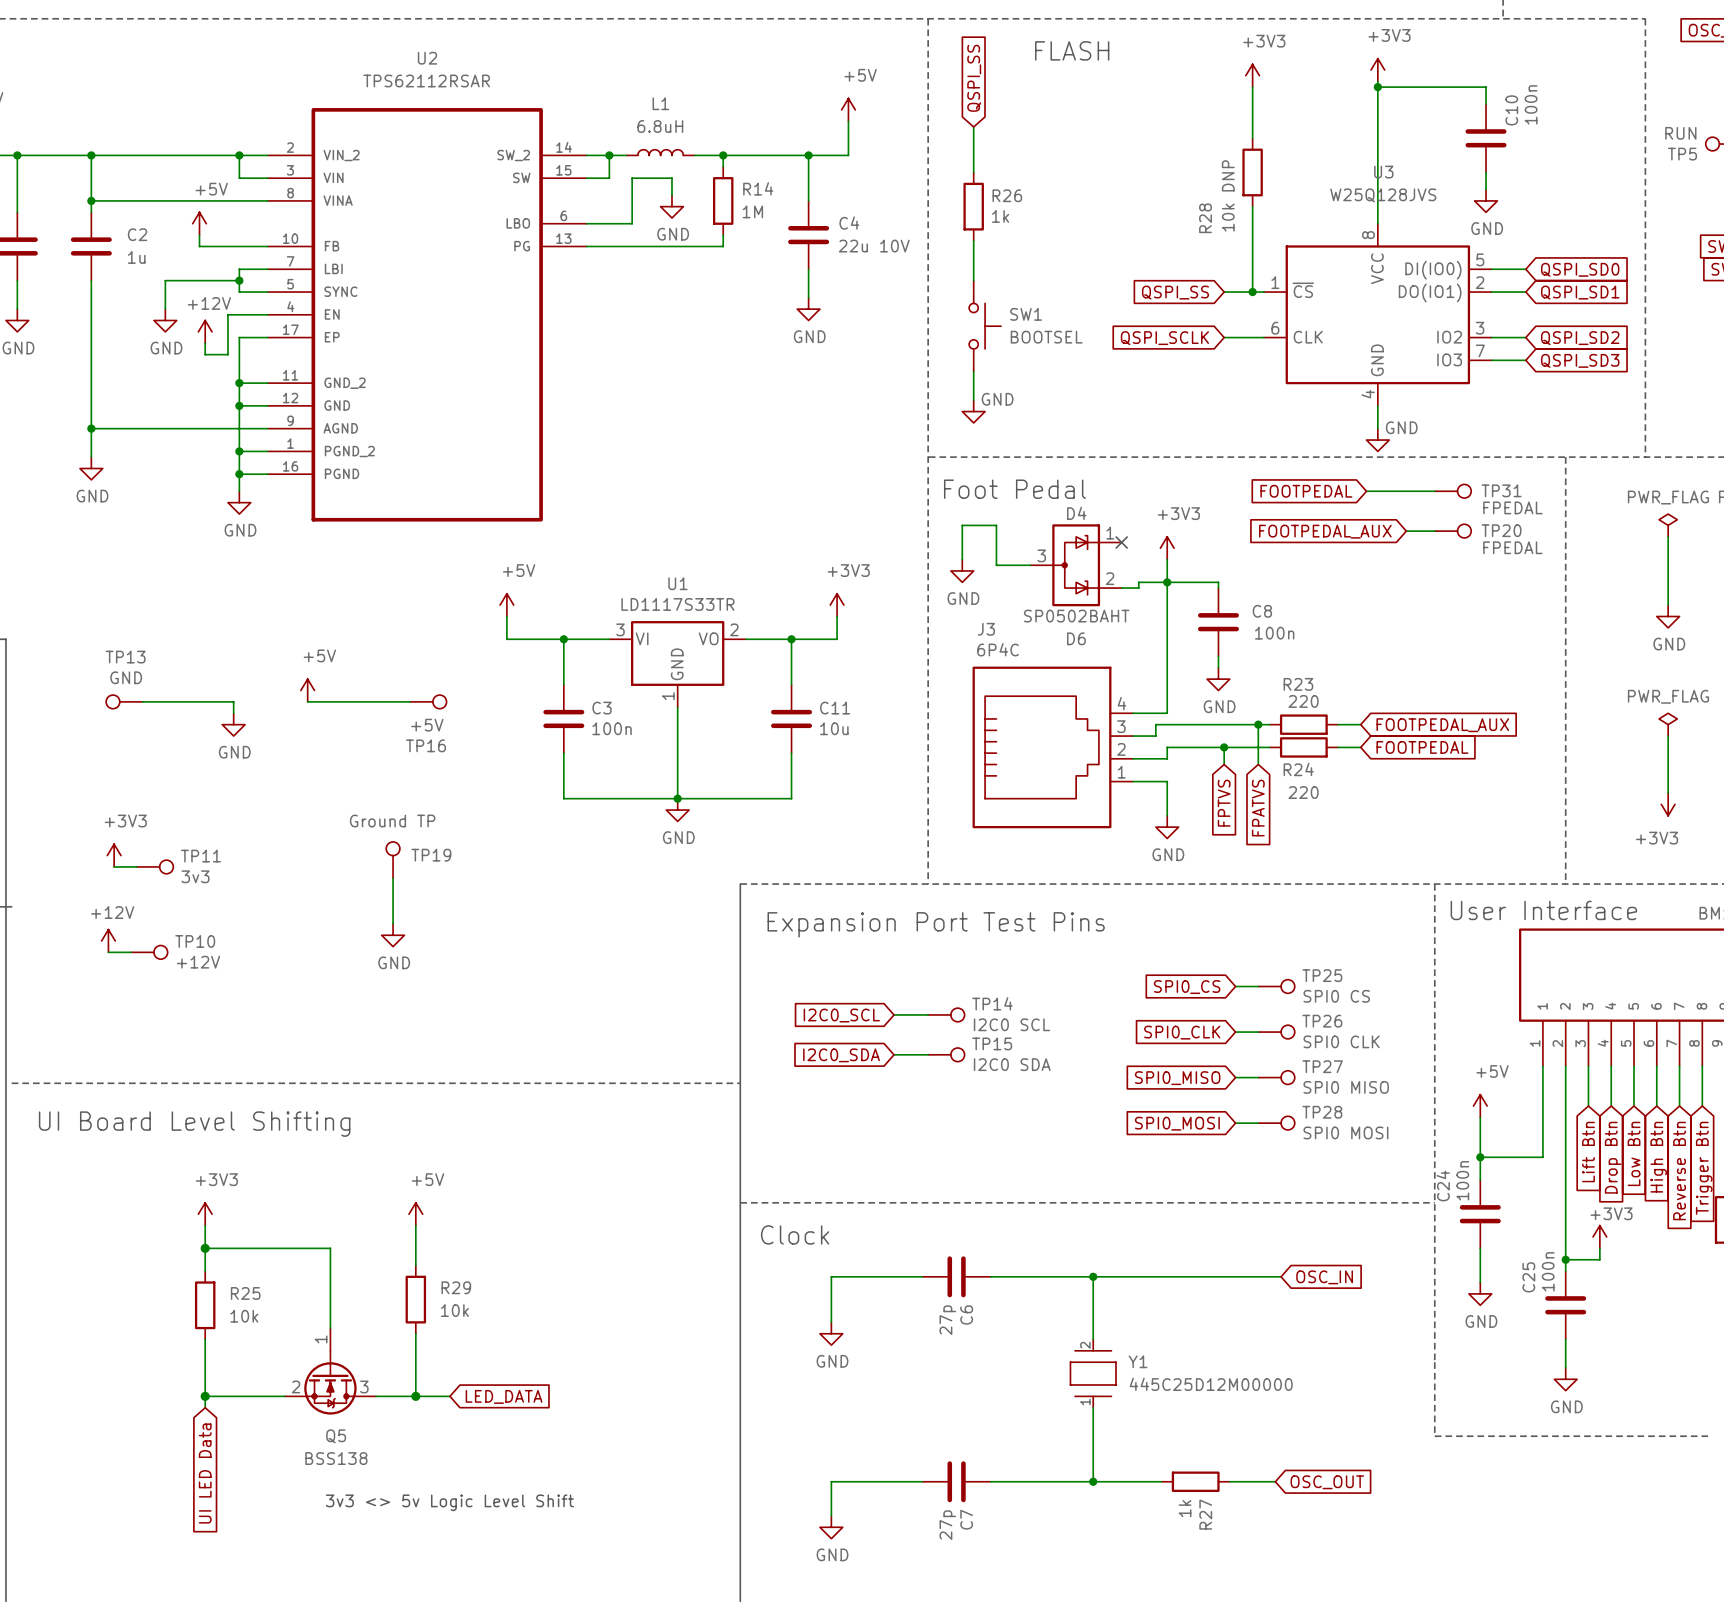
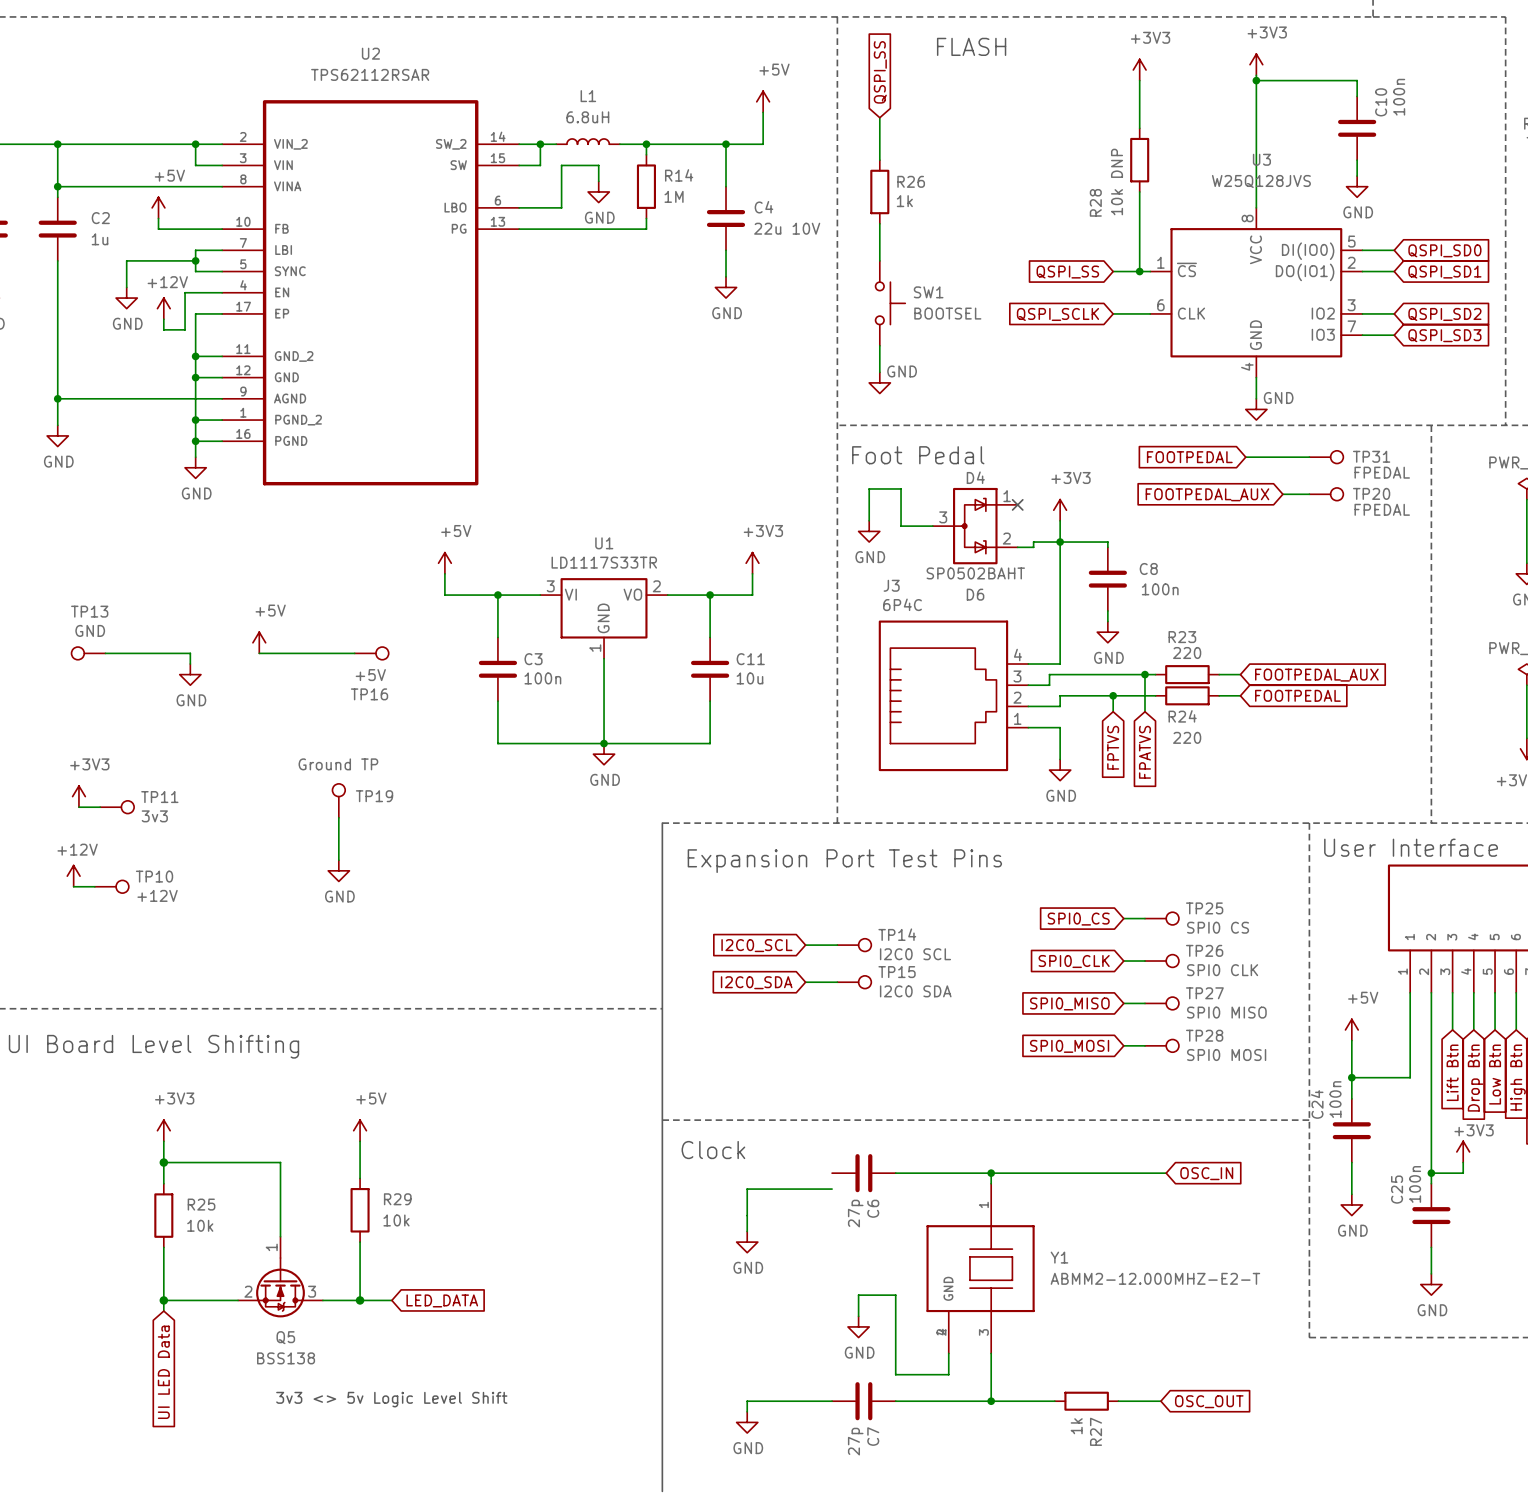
wire: none -> (991, 1173) (991, 1183)
C6 position: (956, 1276) -> (863, 1173)
wire: (990, 1276) (1281, 1276) -> (895, 1173) (1166, 1173)
junction position: (1093, 1276) -> (991, 1173)
global label position: OSC_IN (1324, 1277) -> OSC_IN (1206, 1173)
Y1 symbol: [1070, 1339, 1117, 1408] -> [926, 1183, 1035, 1354]
Y1 name position: Y1 (1138, 1361) -> Y1 (1059, 1257)
Y1 value: 445C25D12M00000 (1211, 1384) -> ABMM2-12.000MHZ-E2-T (1155, 1278)
wire: none -> (858, 1316) (858, 1295) (895, 1295) (895, 1374) (948, 1374) (948, 1353)
power symbol: none -> GND (858, 1326)
wire: (922, 1481) (831, 1481) (831, 1504) -> (832, 1401) (747, 1401)
C7 position: (956, 1481) -> (863, 1401)
wire: (990, 1481) (1161, 1481) -> (895, 1401) (1054, 1401)
wire: none -> (991, 1379) (991, 1401)
junction position: (1093, 1481) -> (991, 1401)
R27 position: (1195, 1481) -> (1086, 1401)
wire: (1229, 1481) (1275, 1481) -> (1118, 1401) (1160, 1401)
global label position: OSC_OUT (1327, 1482) -> OSC_OUT (1209, 1401)

